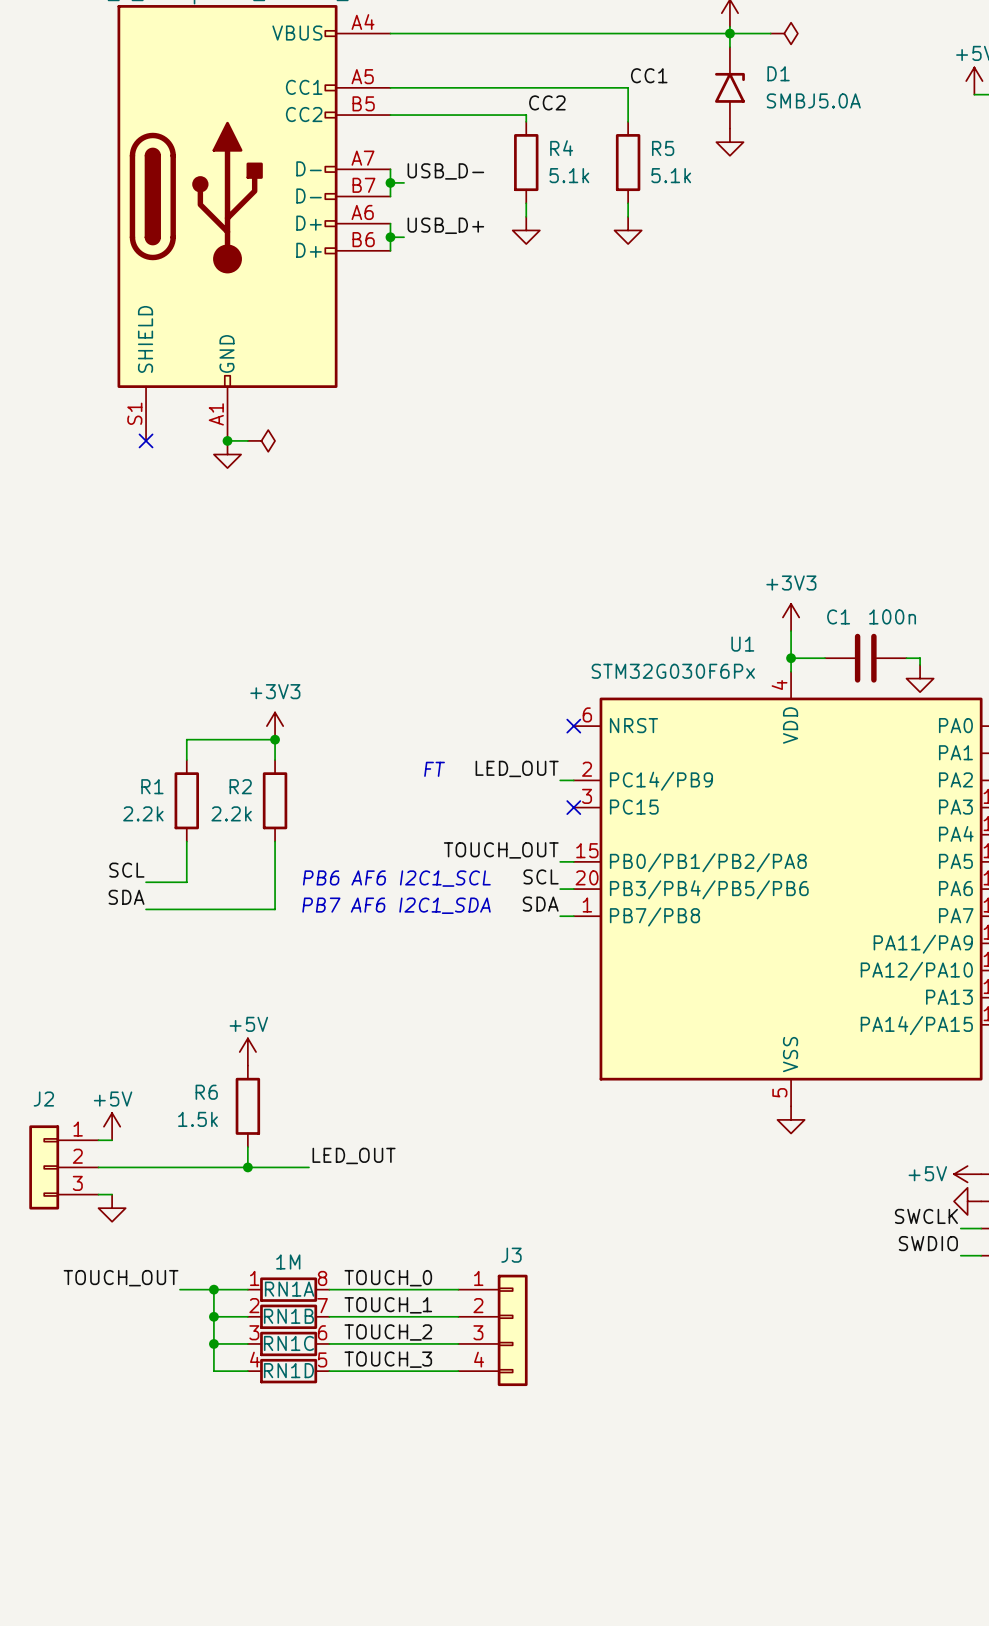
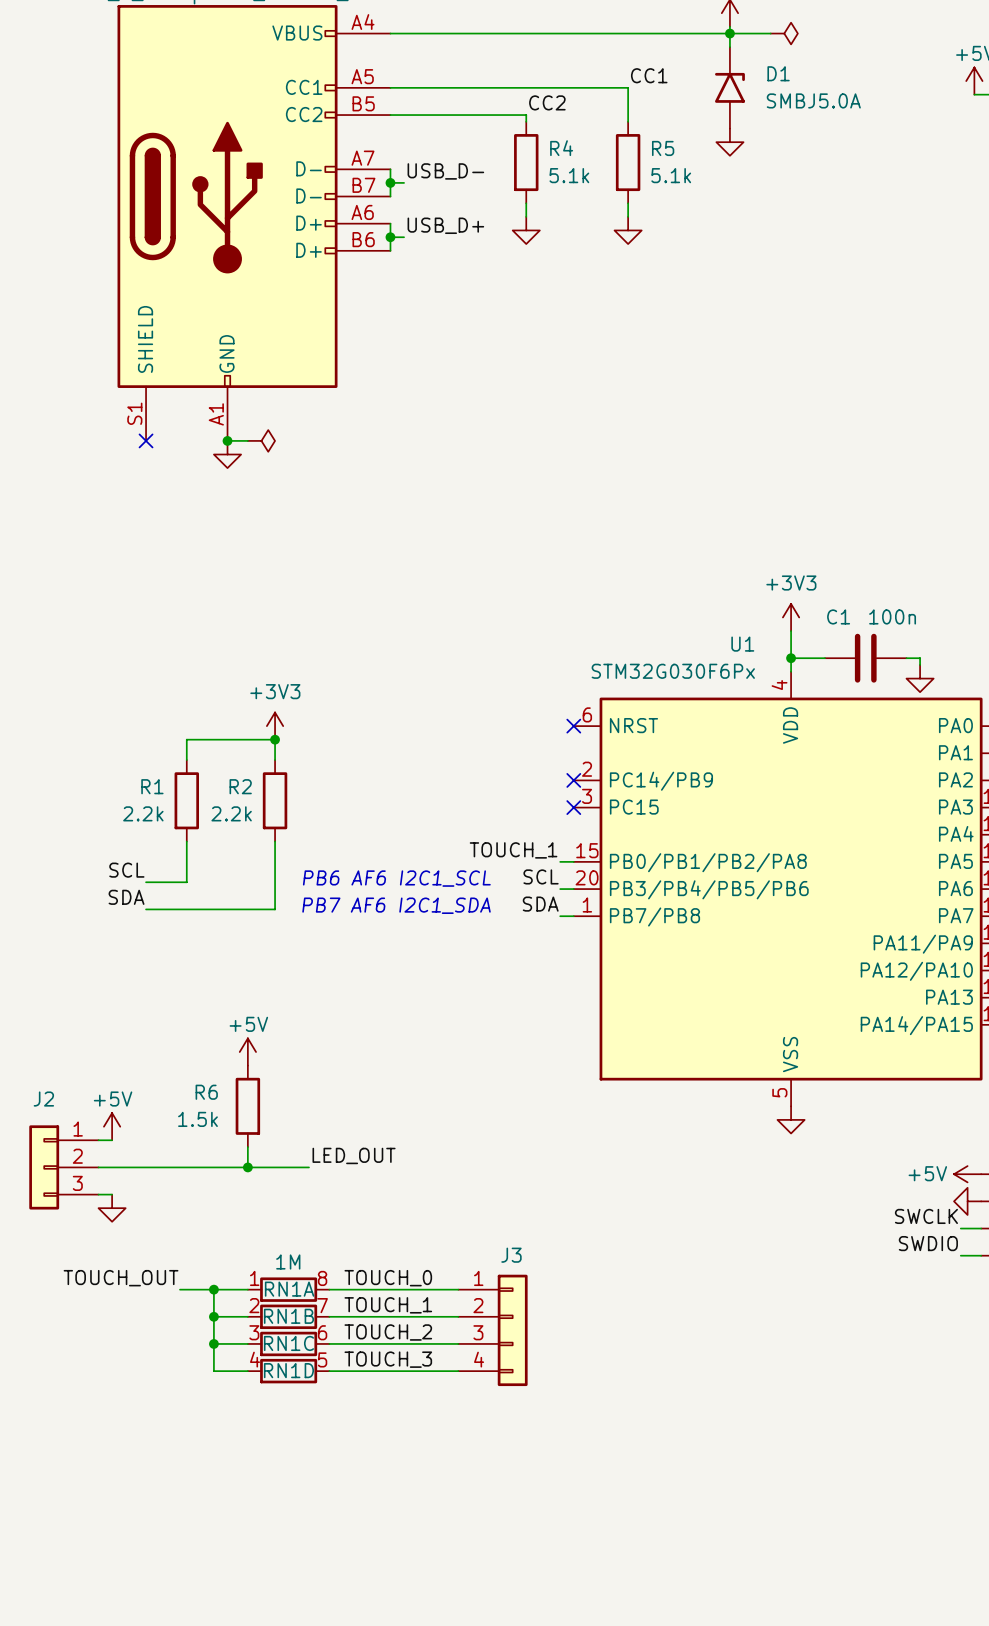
label: LED_OUT (517, 768) -> none
text: FT (434, 769) -> none
wire: (560, 780) (573, 780) -> none
no-connect mark: none -> (573, 780)
label: TOUCH_OUT (501, 850) -> TOUCH_1 (513, 850)

